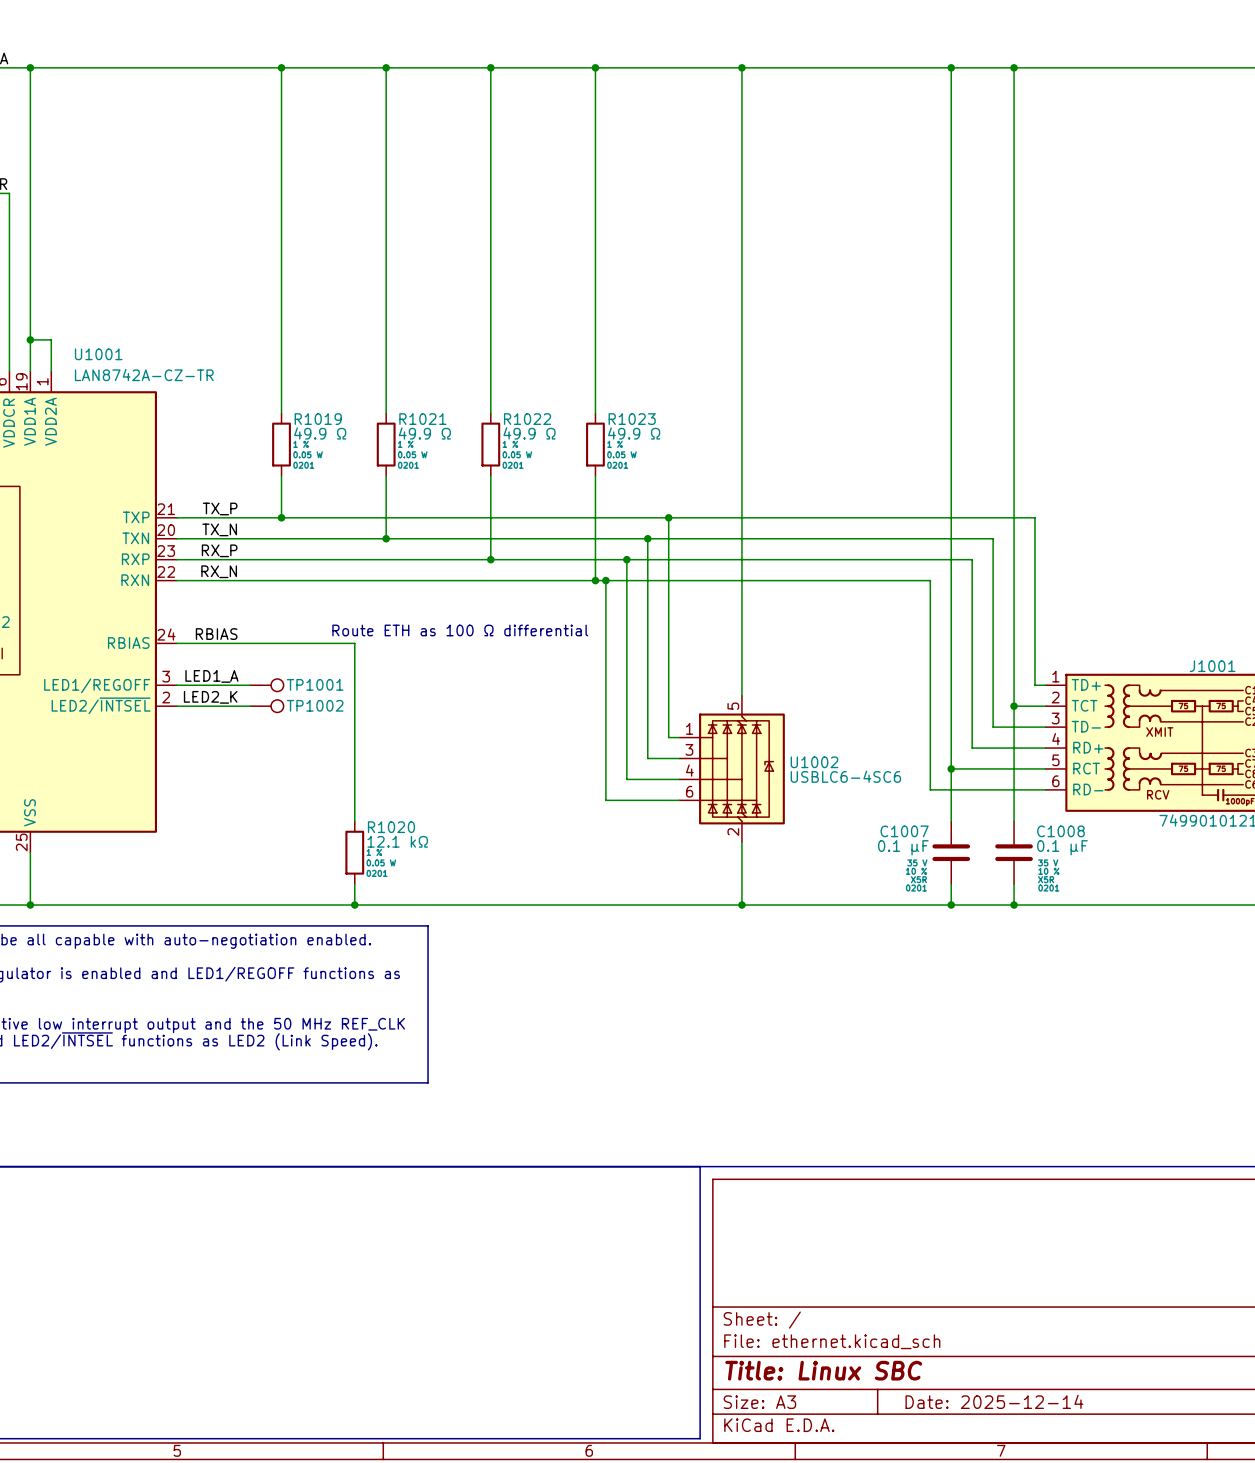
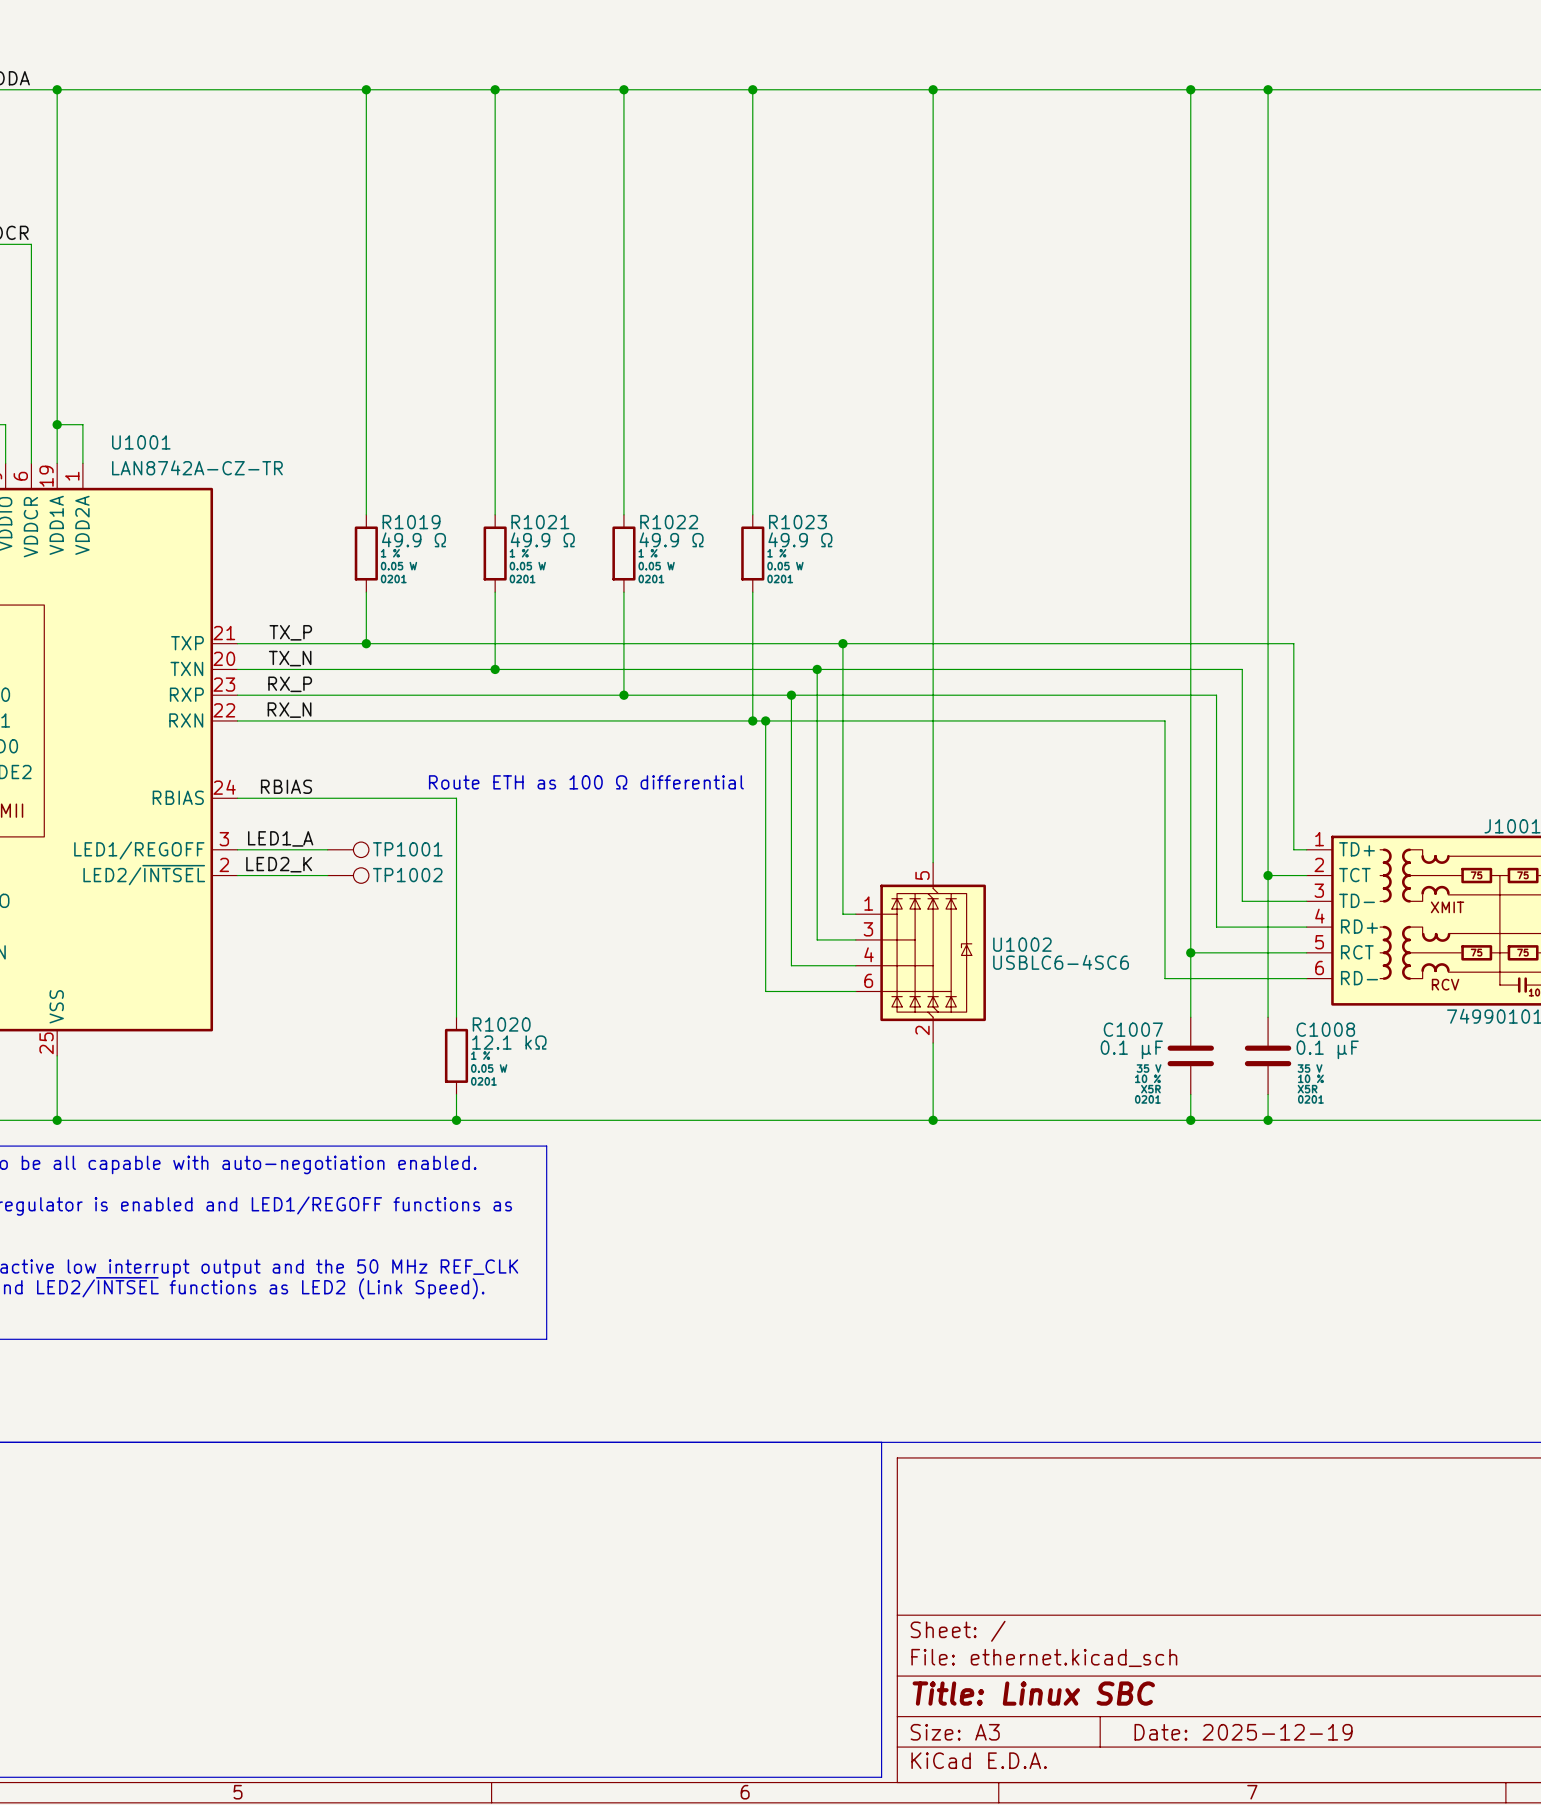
title block: Date: 2025-12-14 (994, 1401) -> Date: 2025-12-19 (1243, 1732)

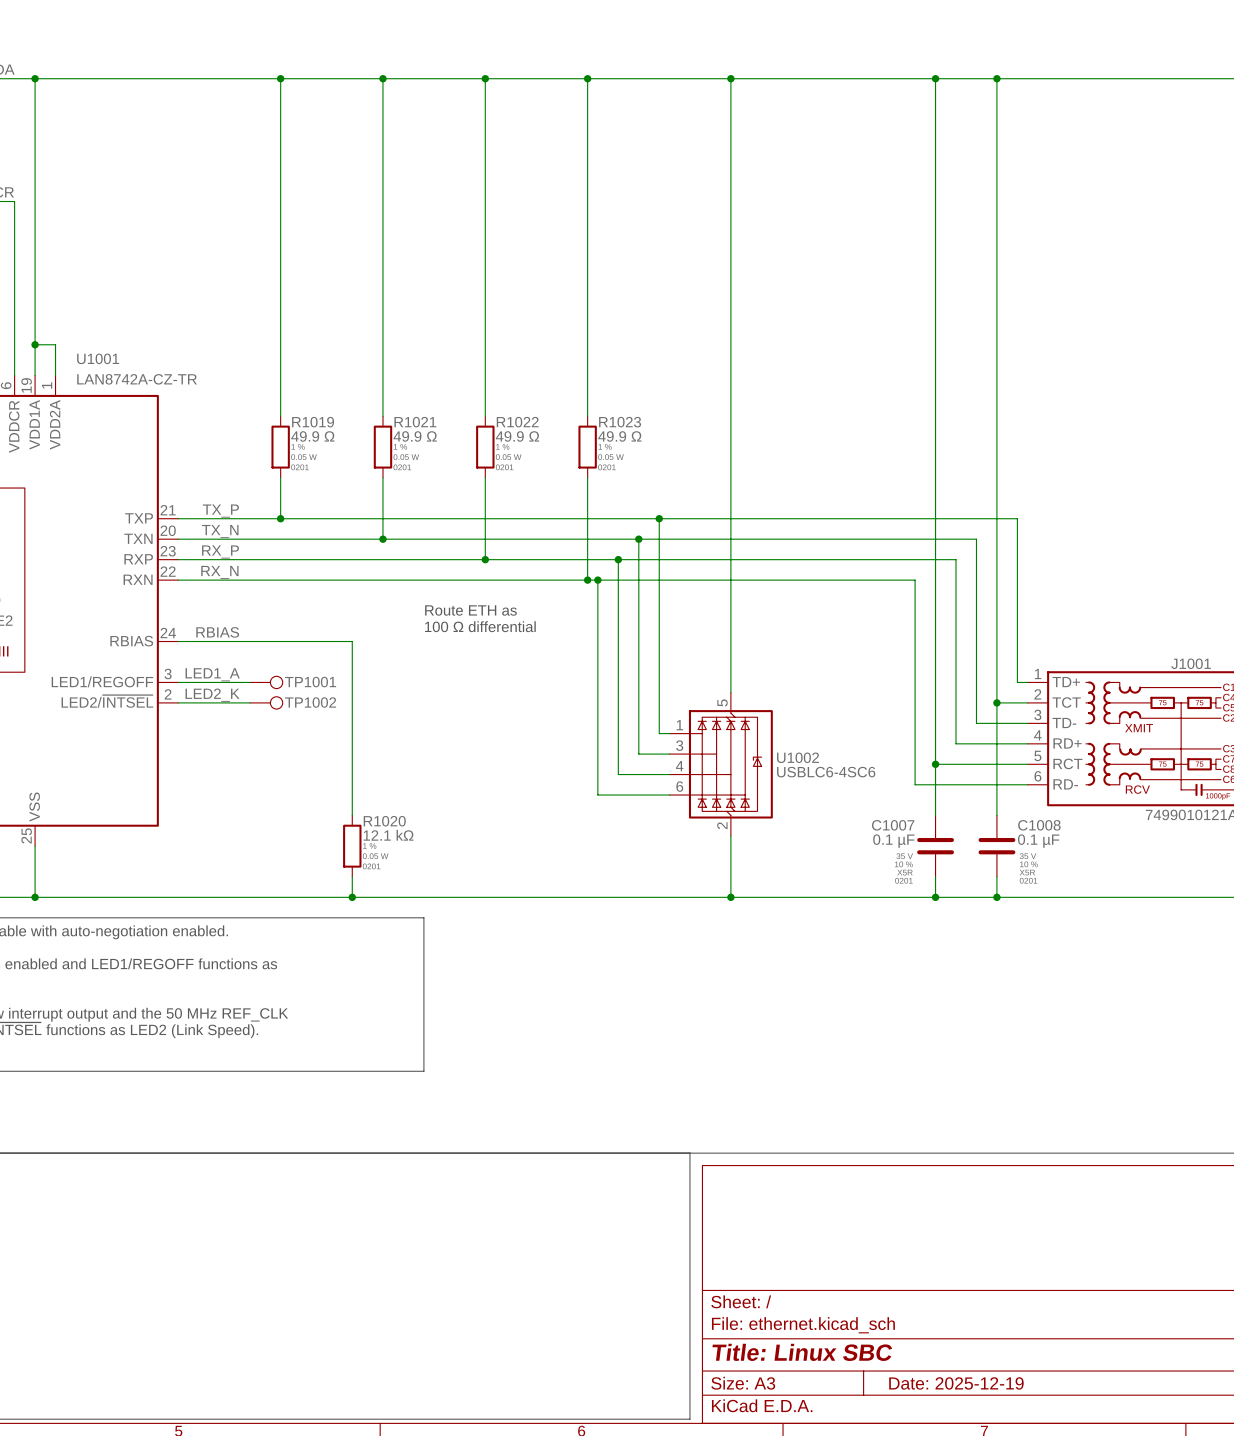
text: none -> Route ETH as (470, 610)
text: Route ETH as 100 Ω differential (586, 782) -> 100 Ω differential (480, 626)

